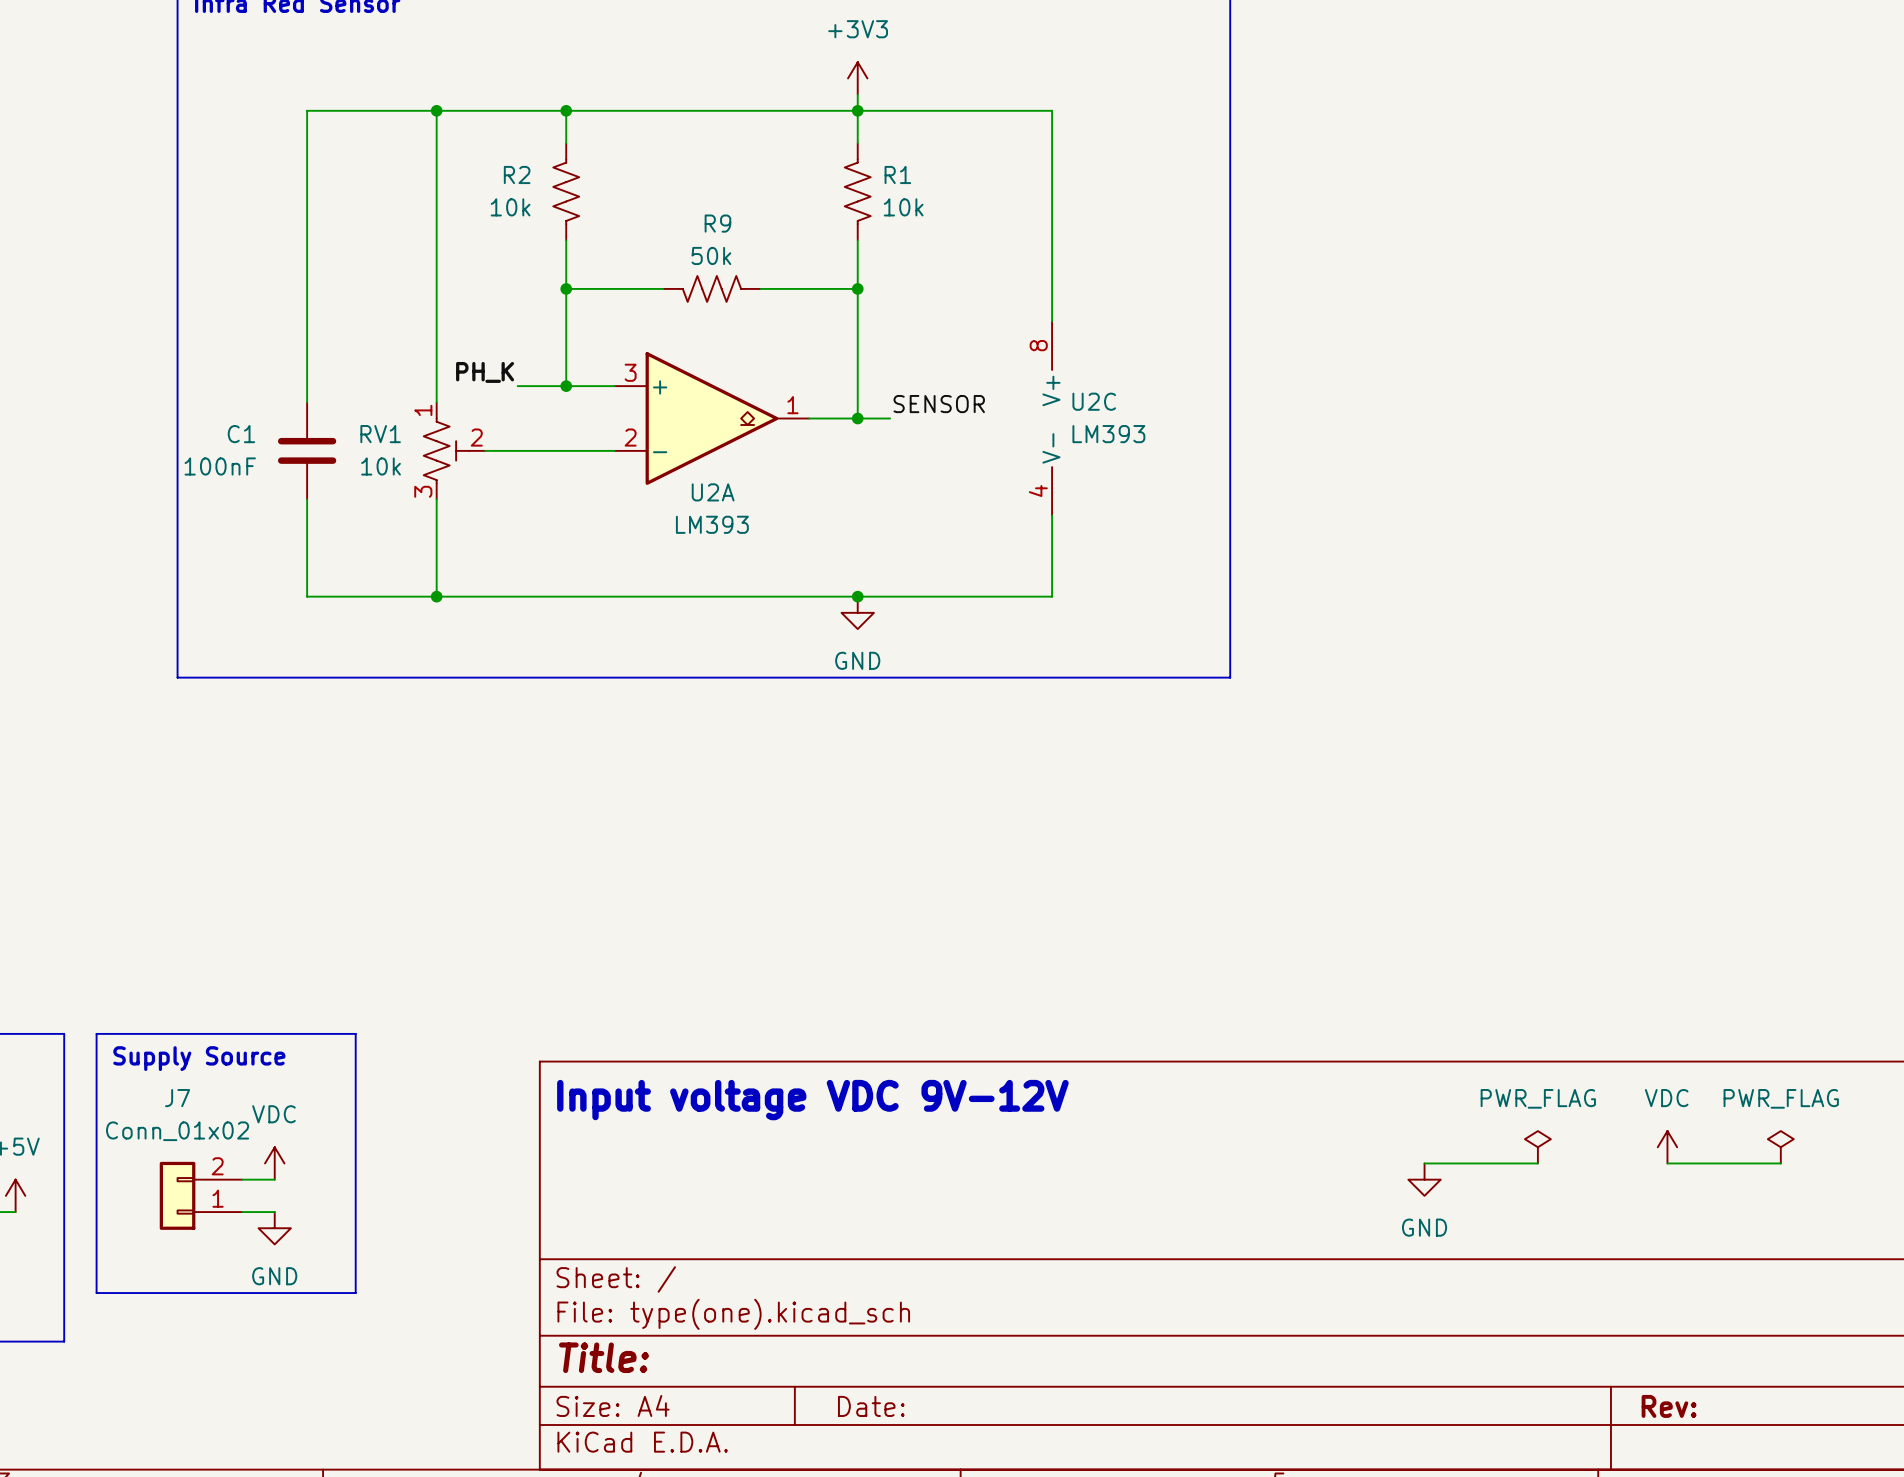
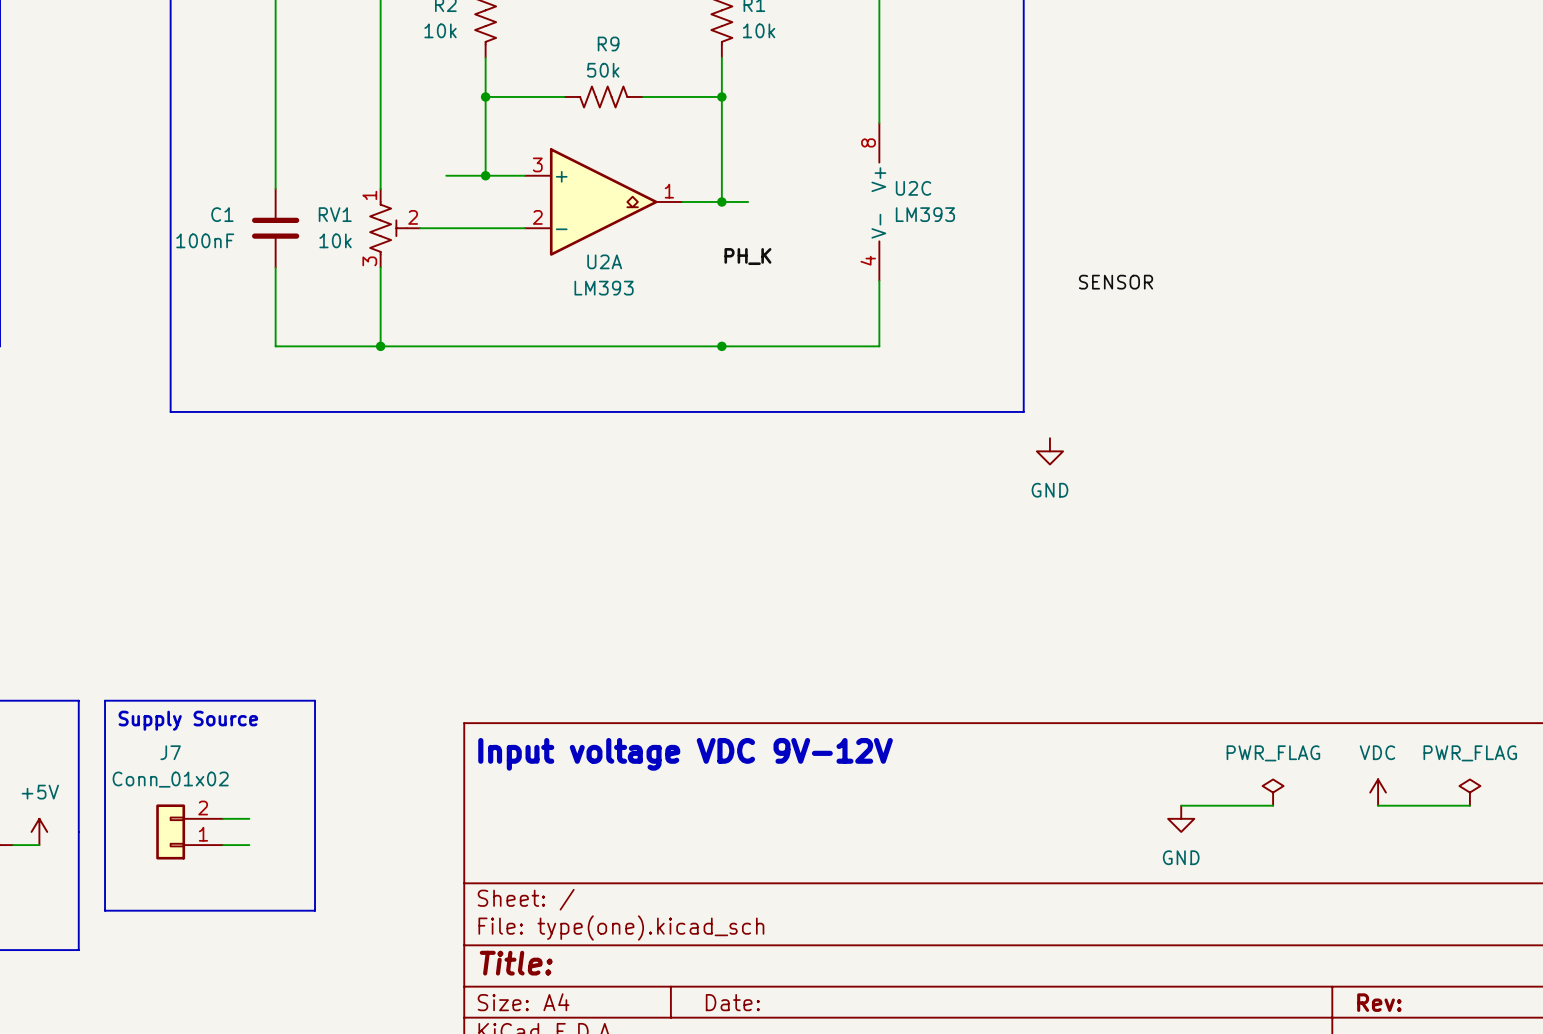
label: PH_K (485, 372) -> none
label: SENSOR (939, 404) -> none
label: none -> PH_K (747, 256)
label: none -> SENSOR (1116, 282)
power symbol: GND (857, 612) -> none
power symbol: none -> GND (1049, 451)
power symbol: VDC (274, 1163) -> none
power symbol: GND (274, 1228) -> none

